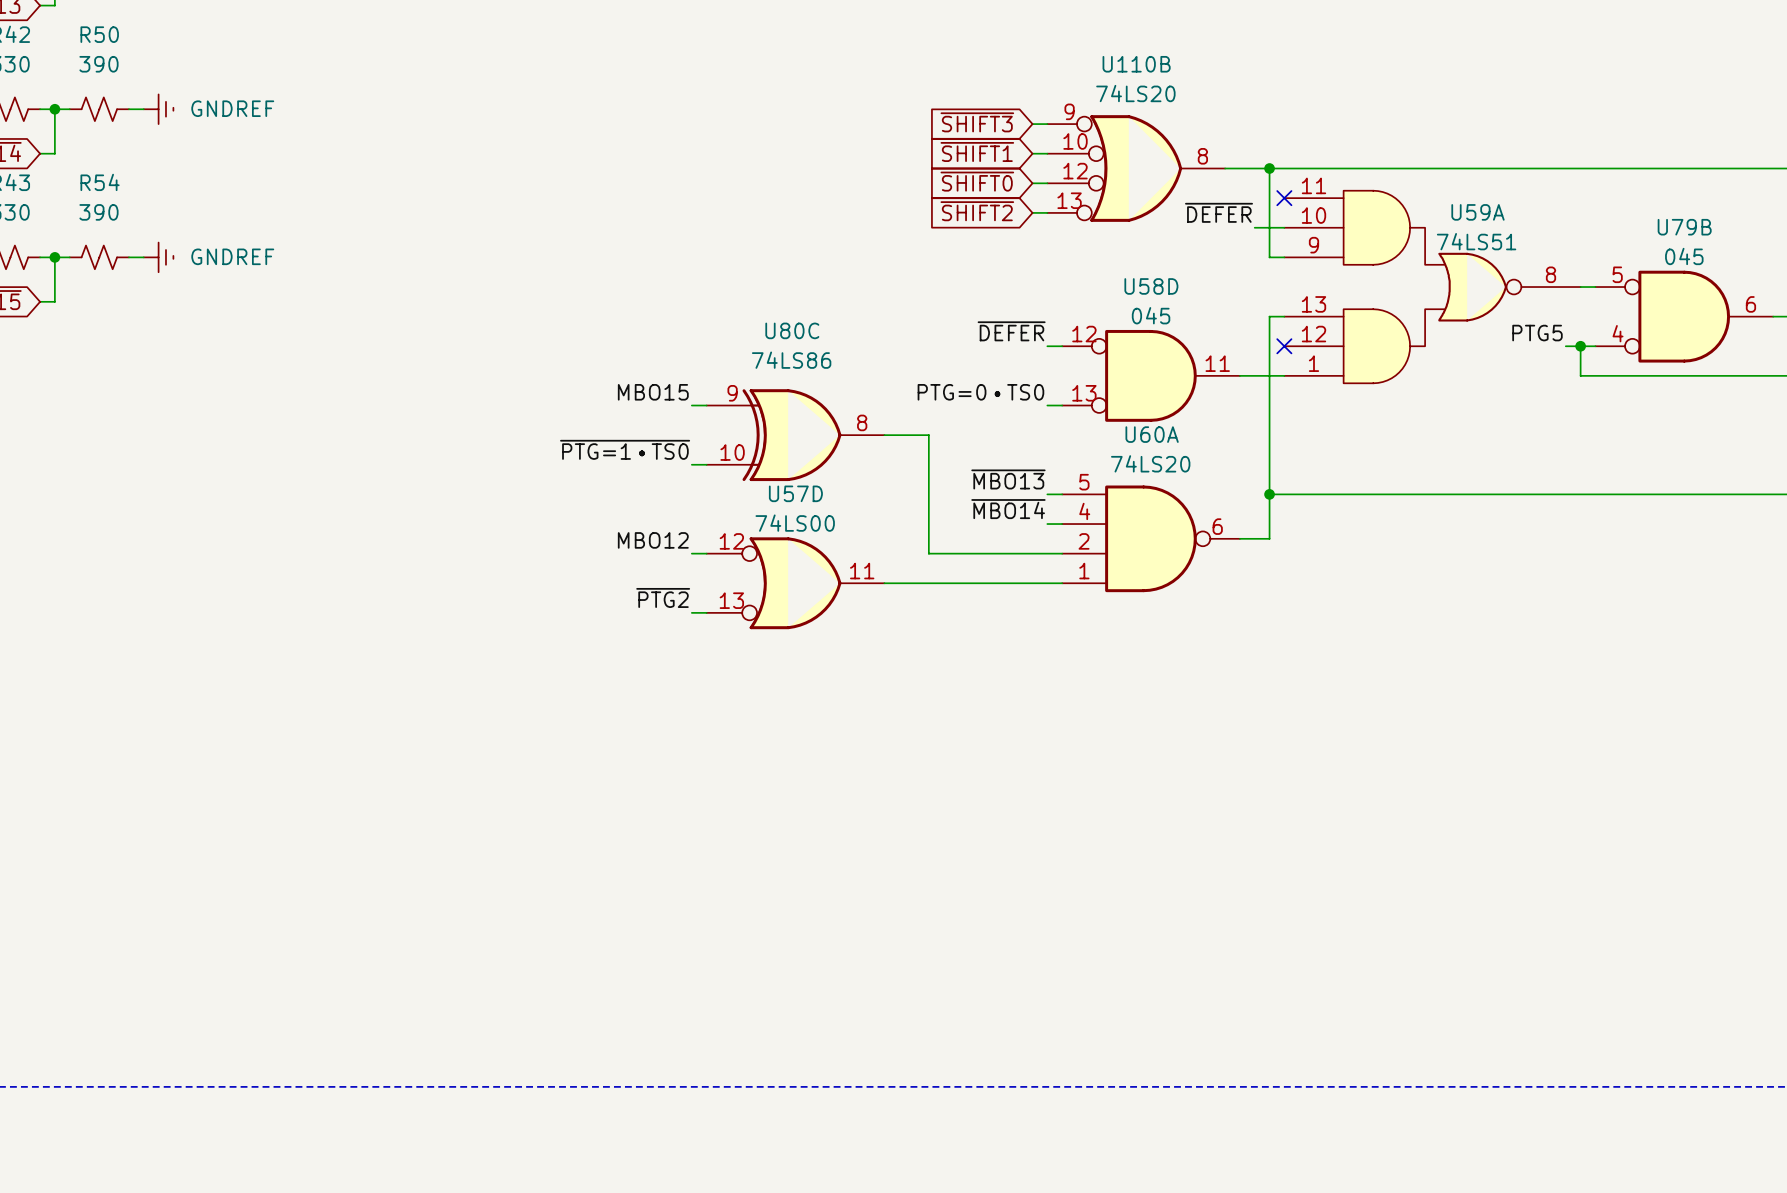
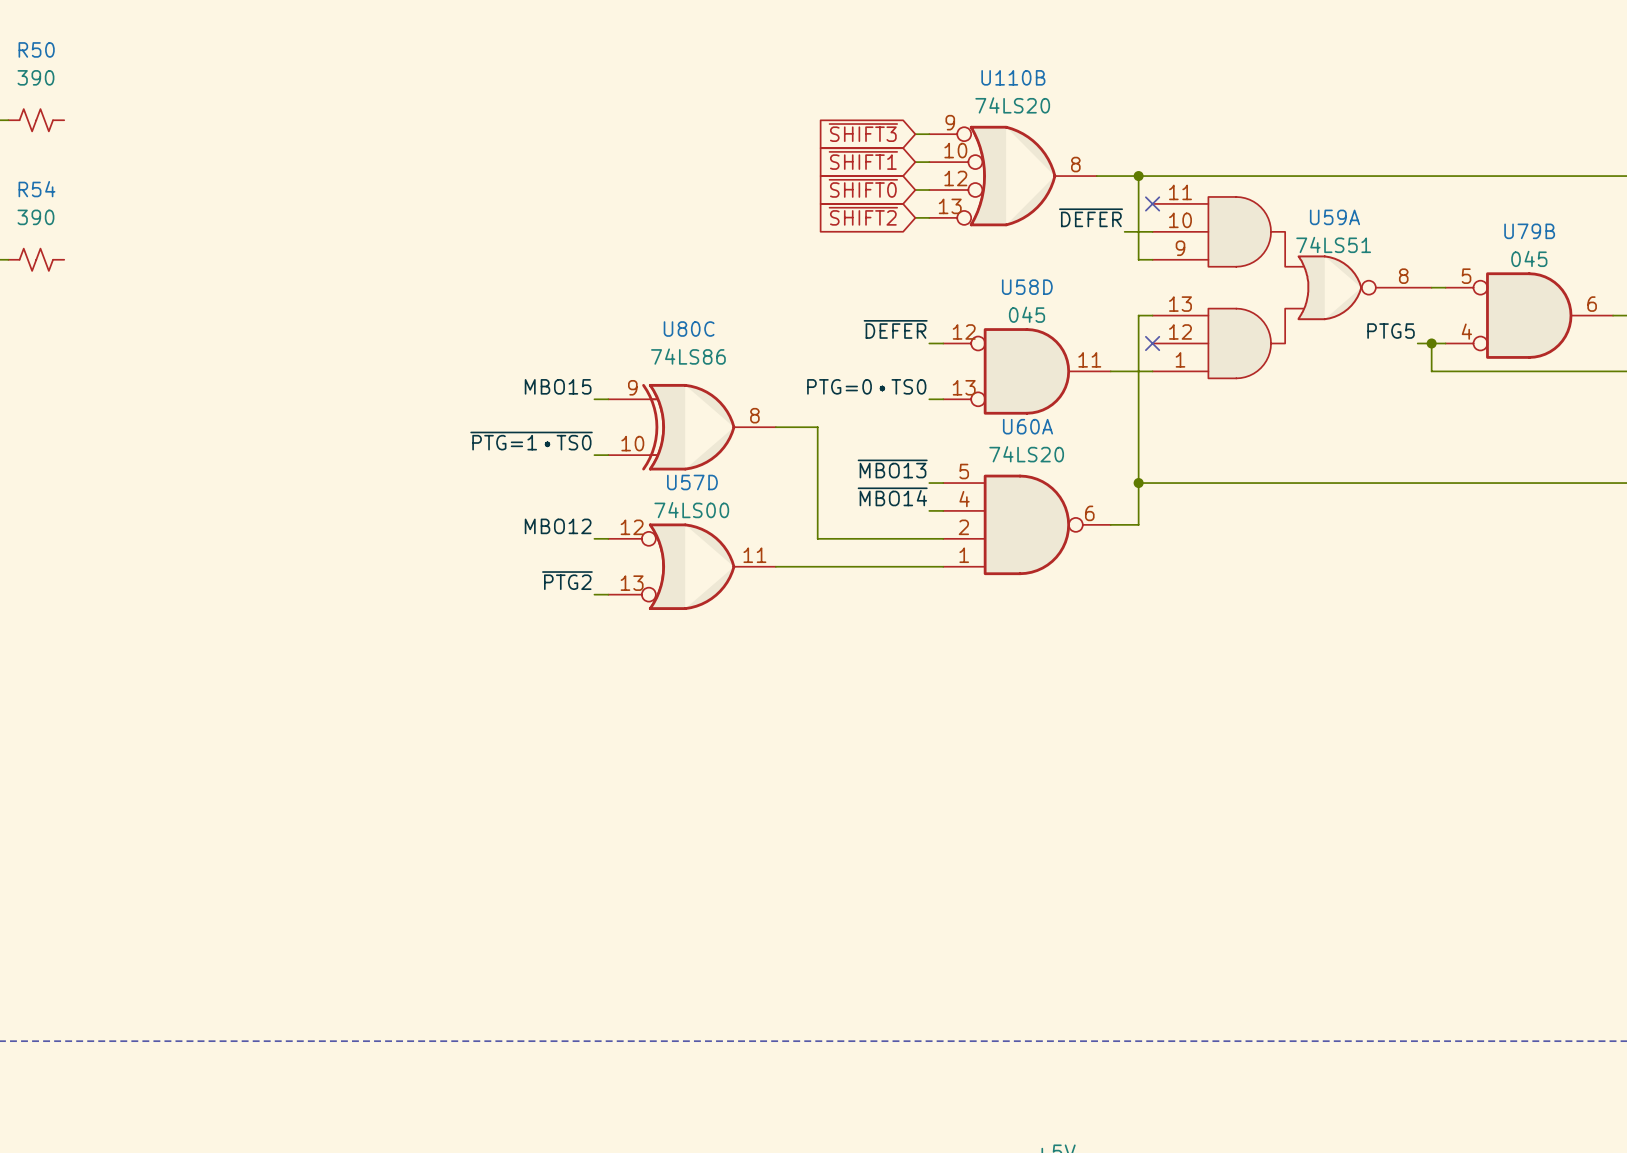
wire: (128, 109) (143, 109) -> none
power symbol: GNDREF (158, 109) -> none
wire: (128, 257) (143, 257) -> none
power symbol: GNDREF (158, 257) -> none

